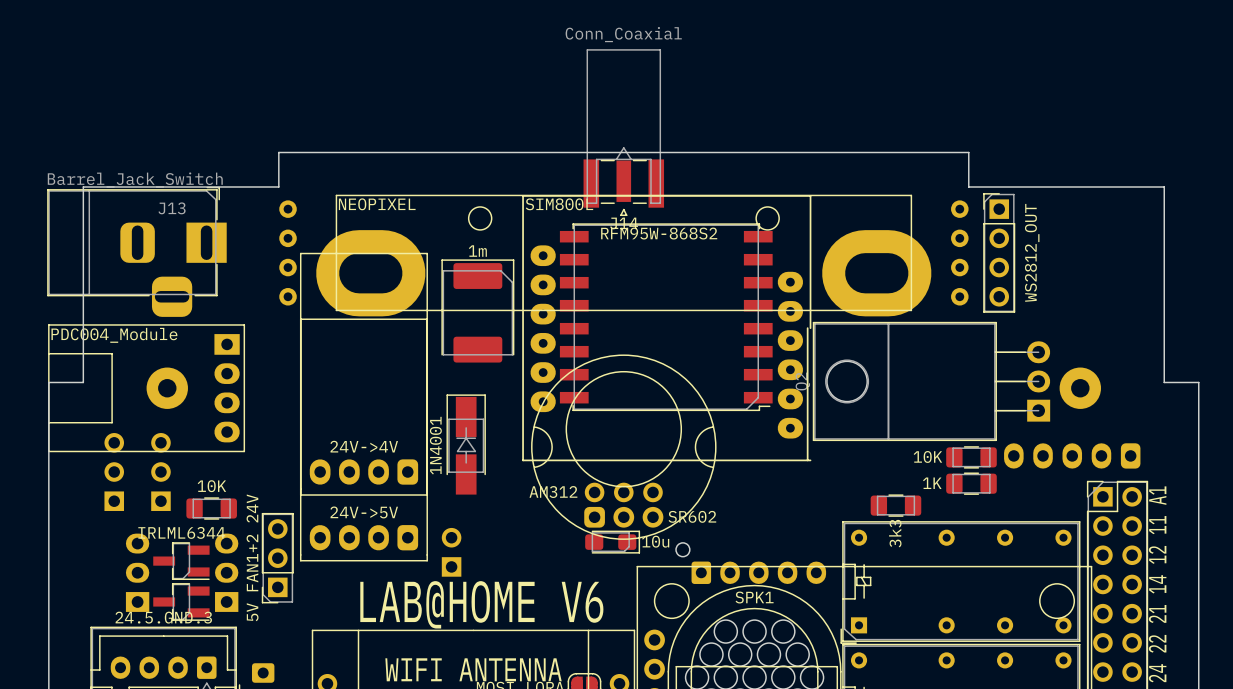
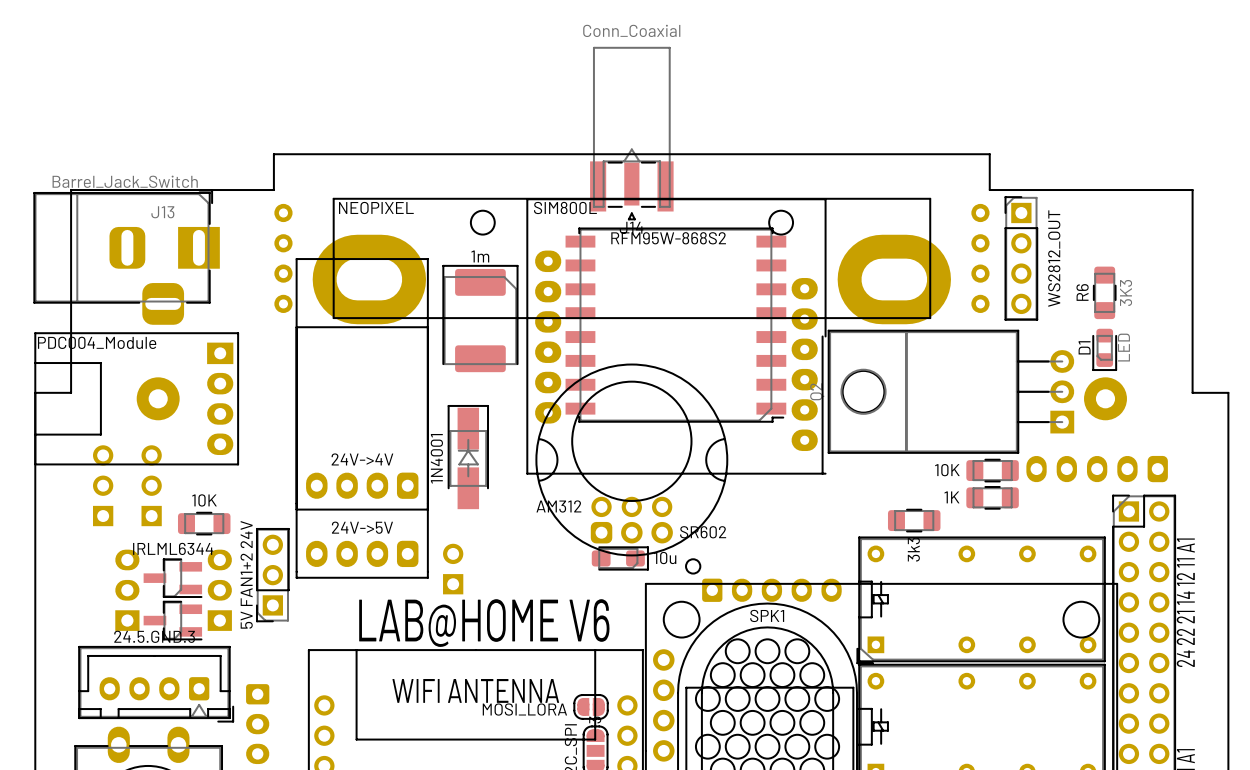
R6: none -> 3K3 (1104, 292)
D1: none -> LED (1104, 349)

